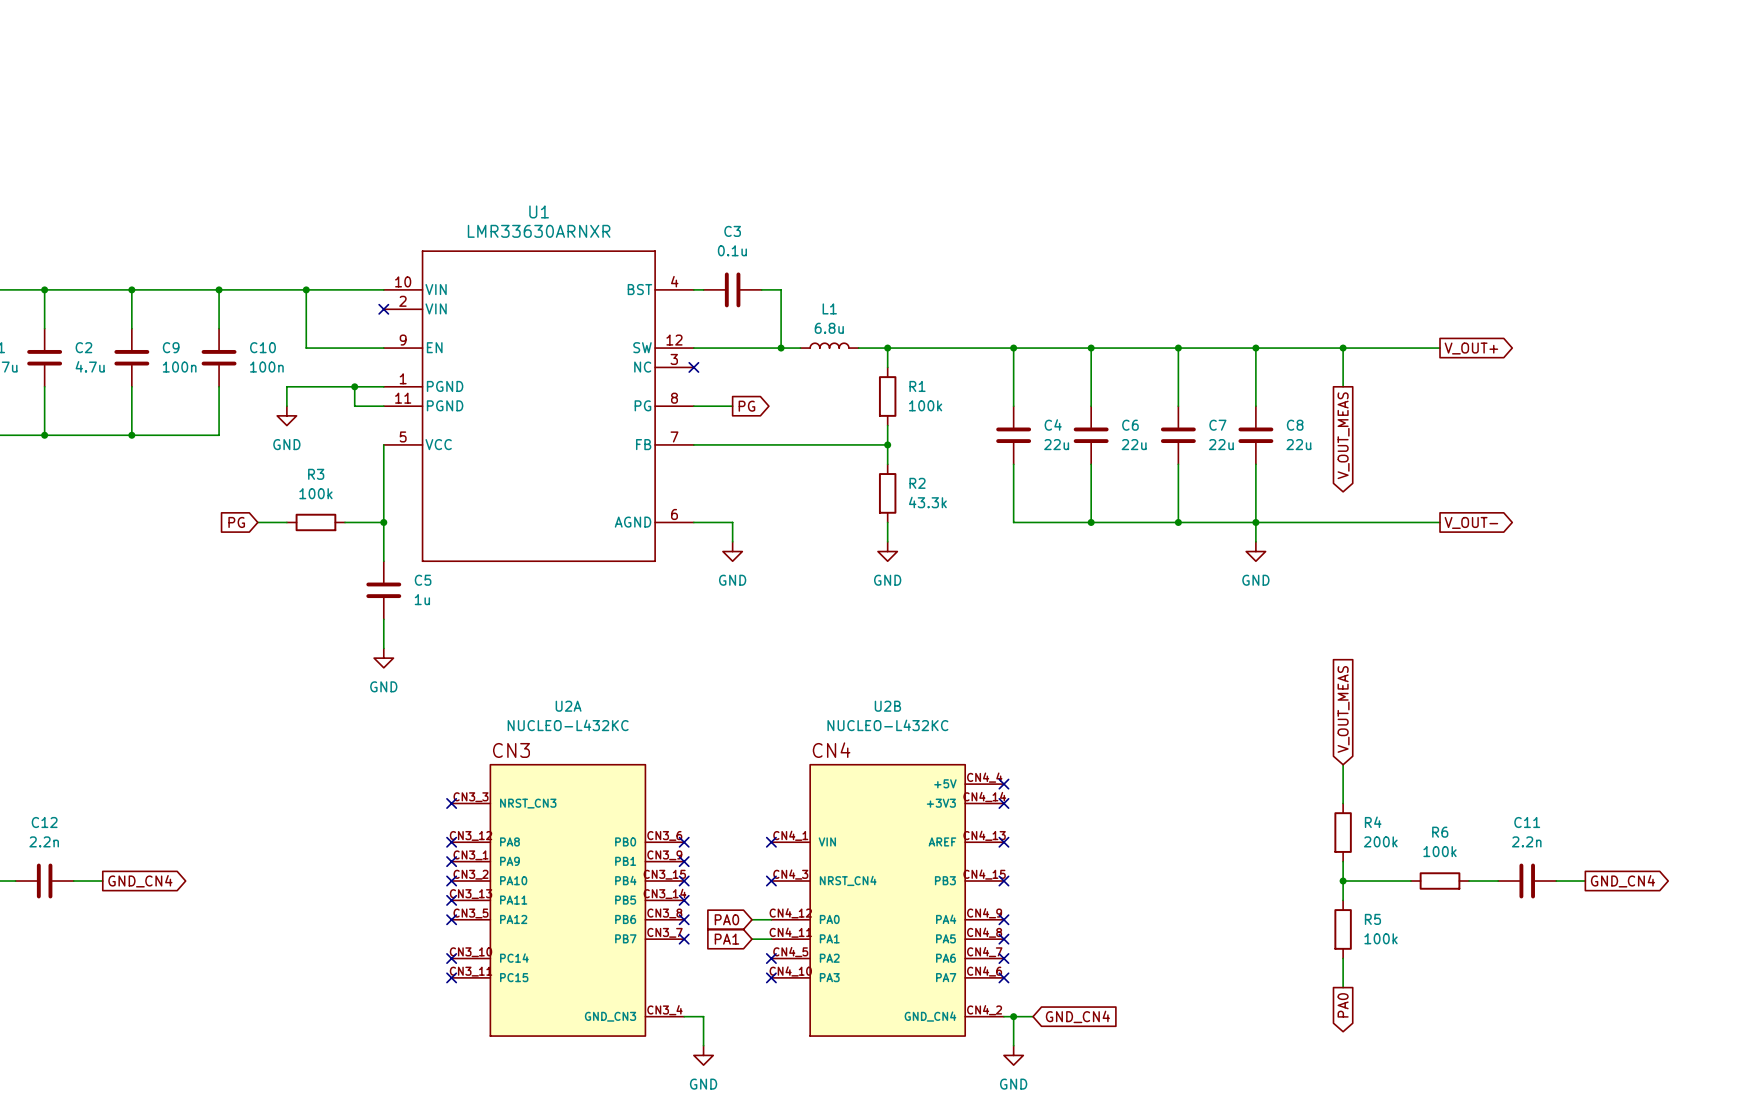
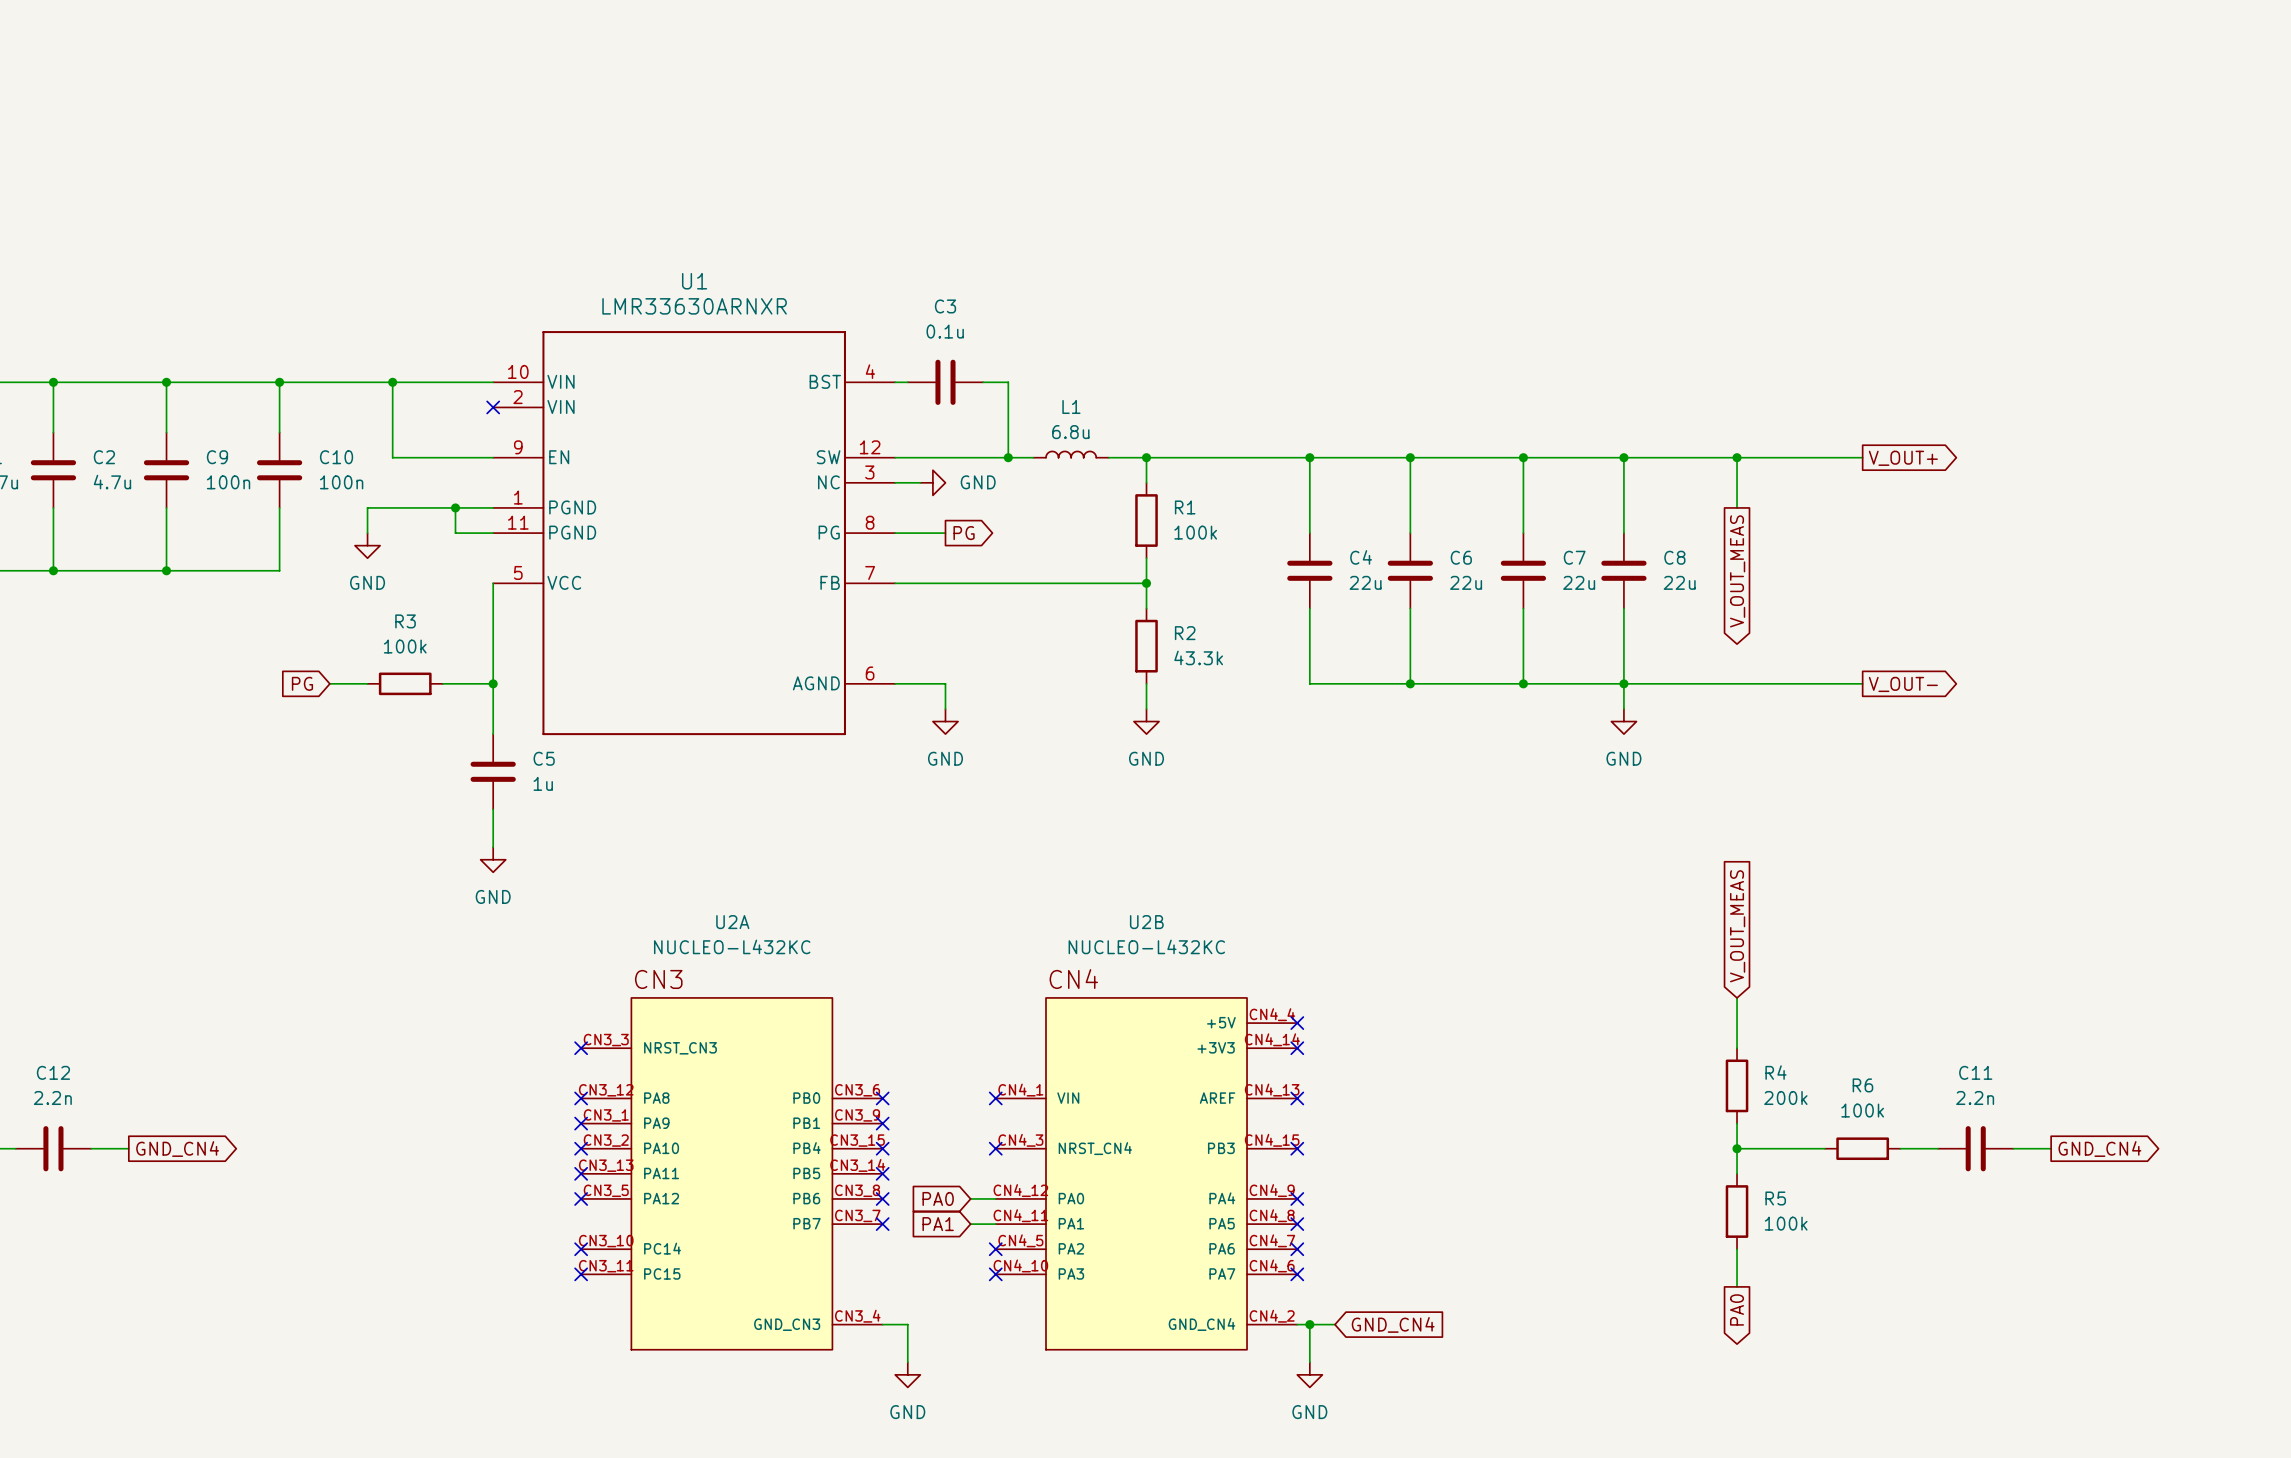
wire: none -> (895, 482) (920, 482)
no-connect mark: (693, 367) -> none
power symbol: none -> GND (932, 482)

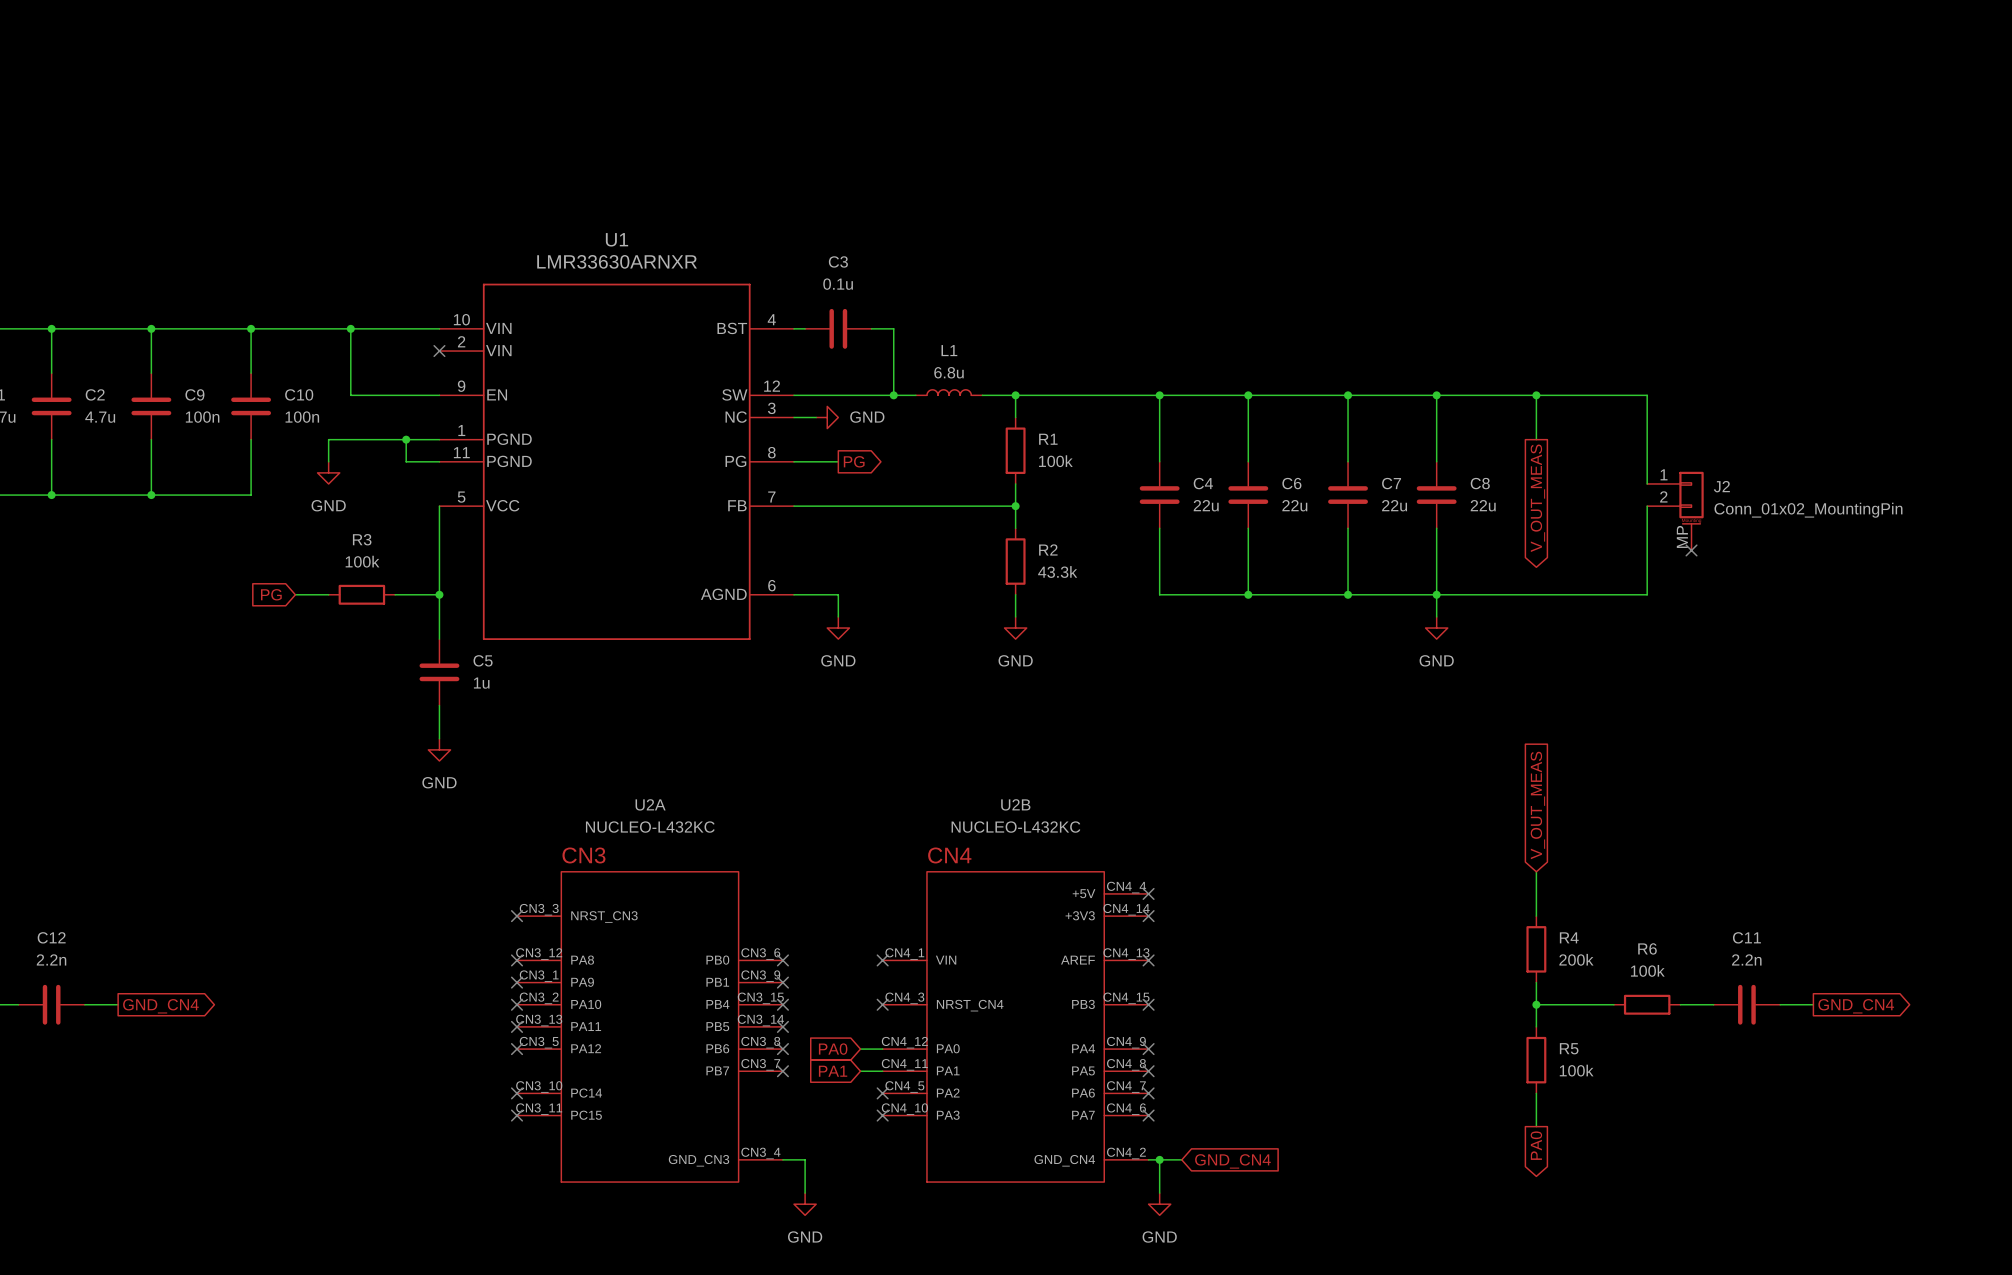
wire: none -> (1647, 395) (1647, 483)
global label: V_OUT+ (1903, 458) -> none
wire: none -> (1647, 506) (1647, 594)
J2: none -> Conn_01x02_MountingPin (1675, 511)
no-connect mark: none -> (1691, 550)
global label: V_OUT- (1903, 684) -> none

